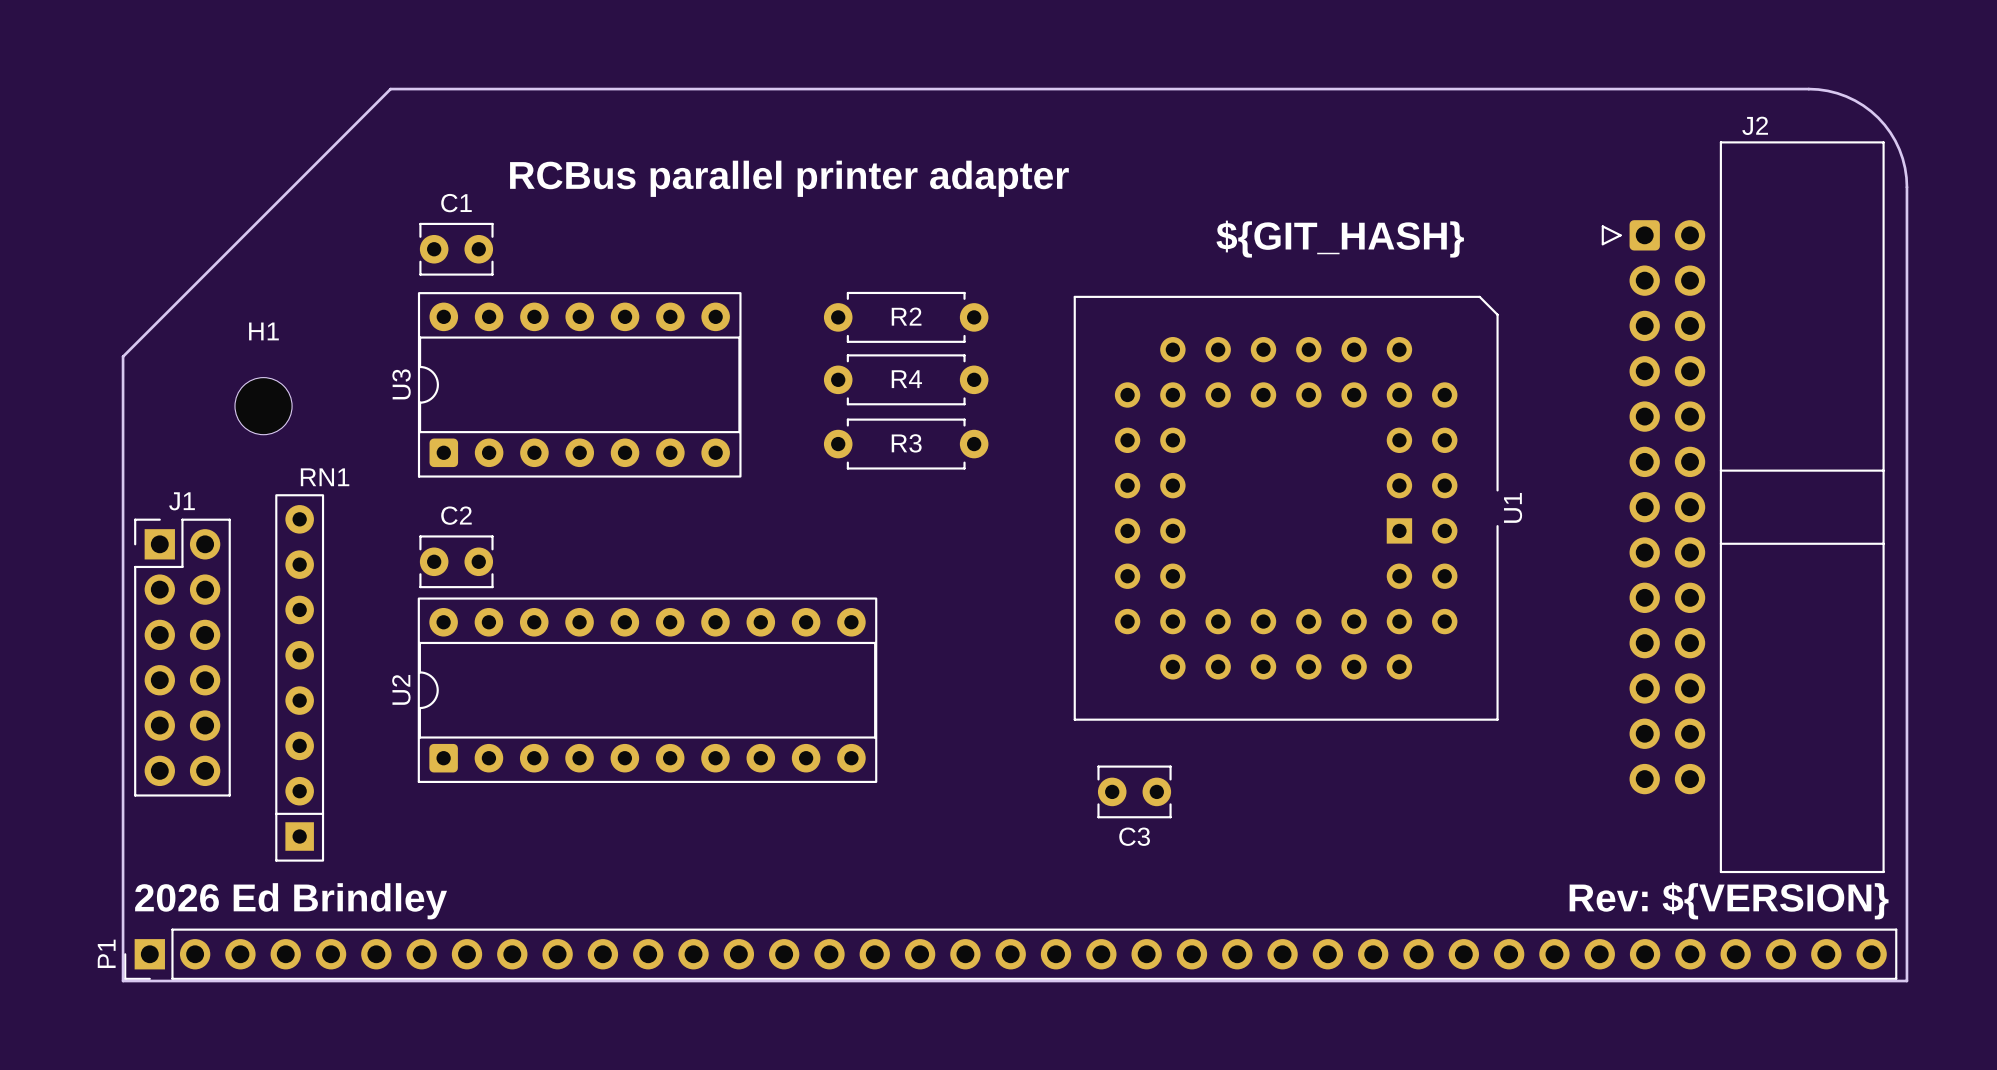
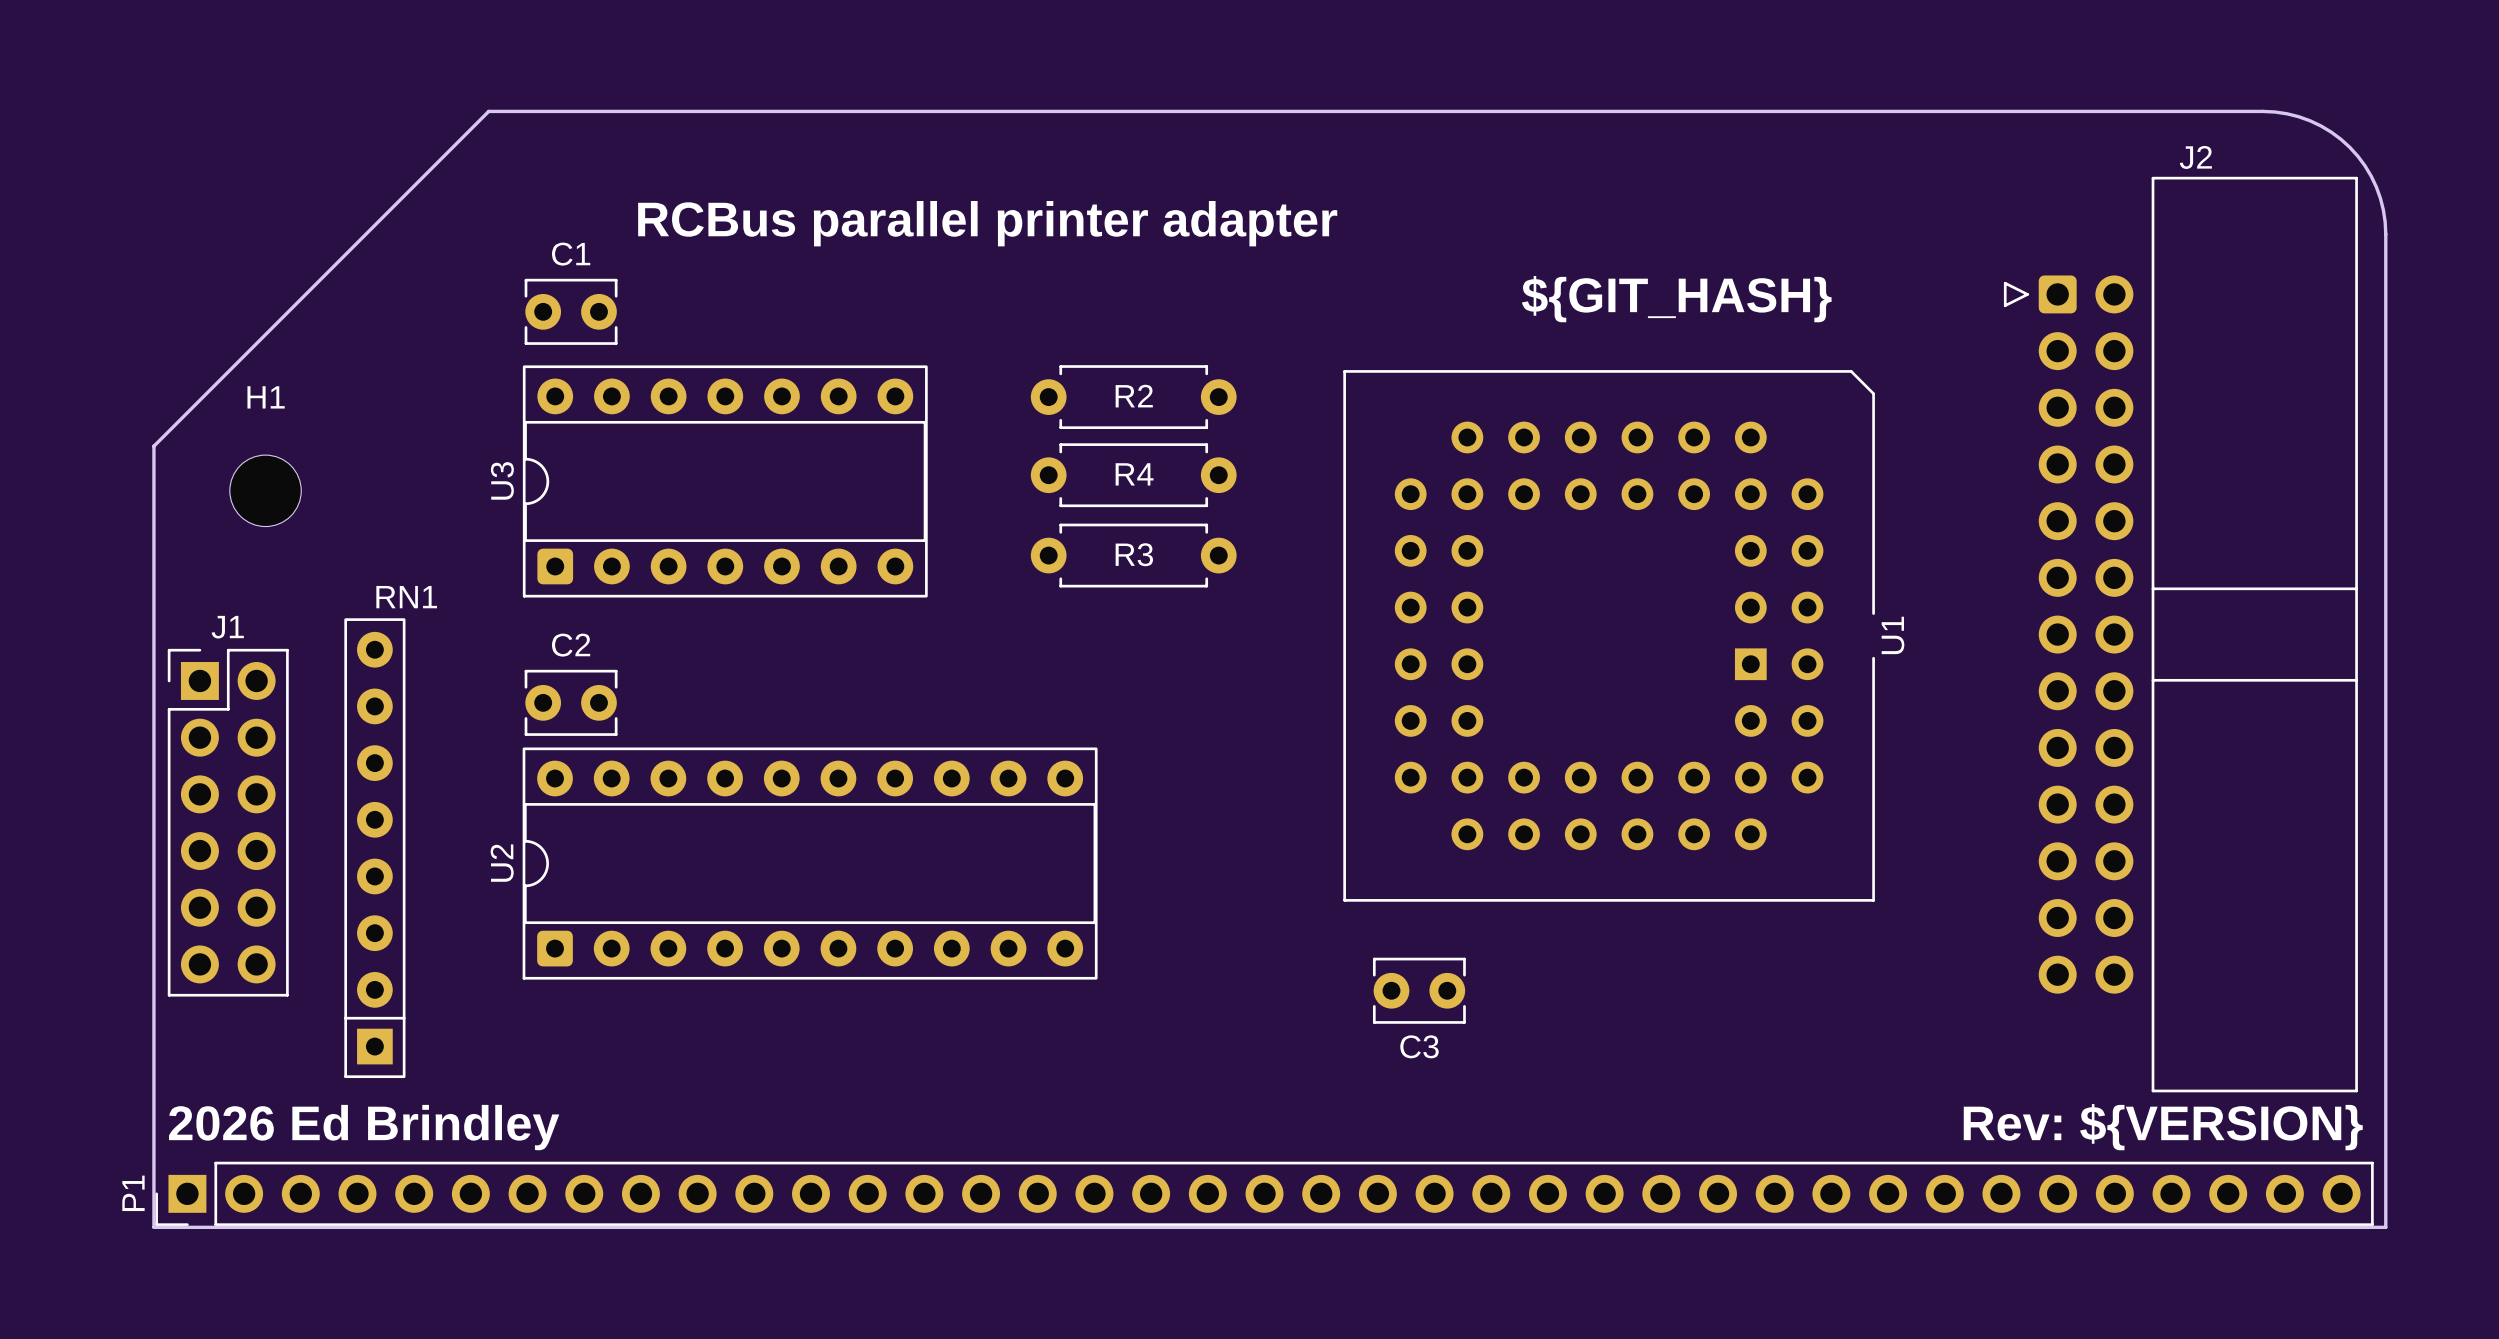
H1 position: (263, 406) -> (265, 490)

